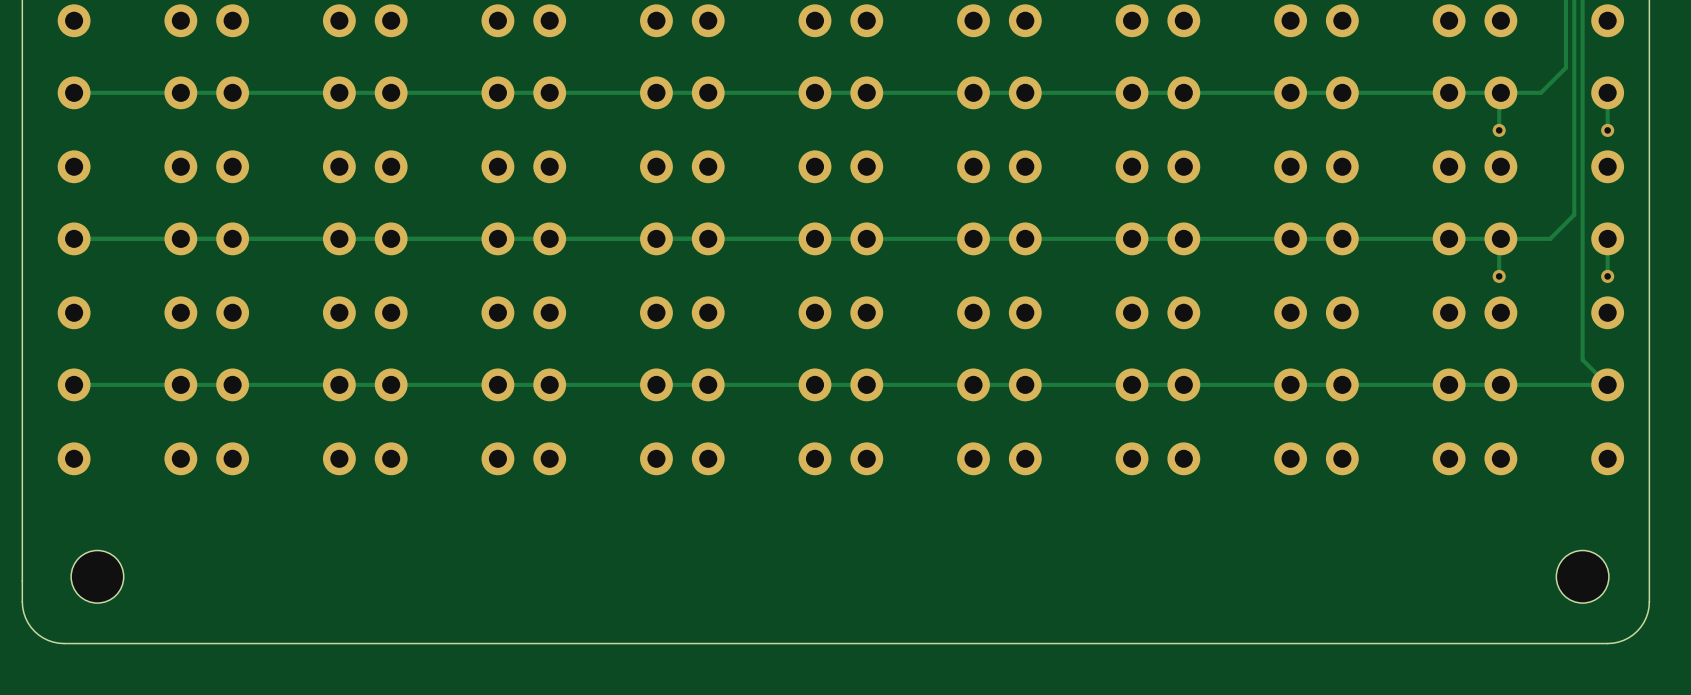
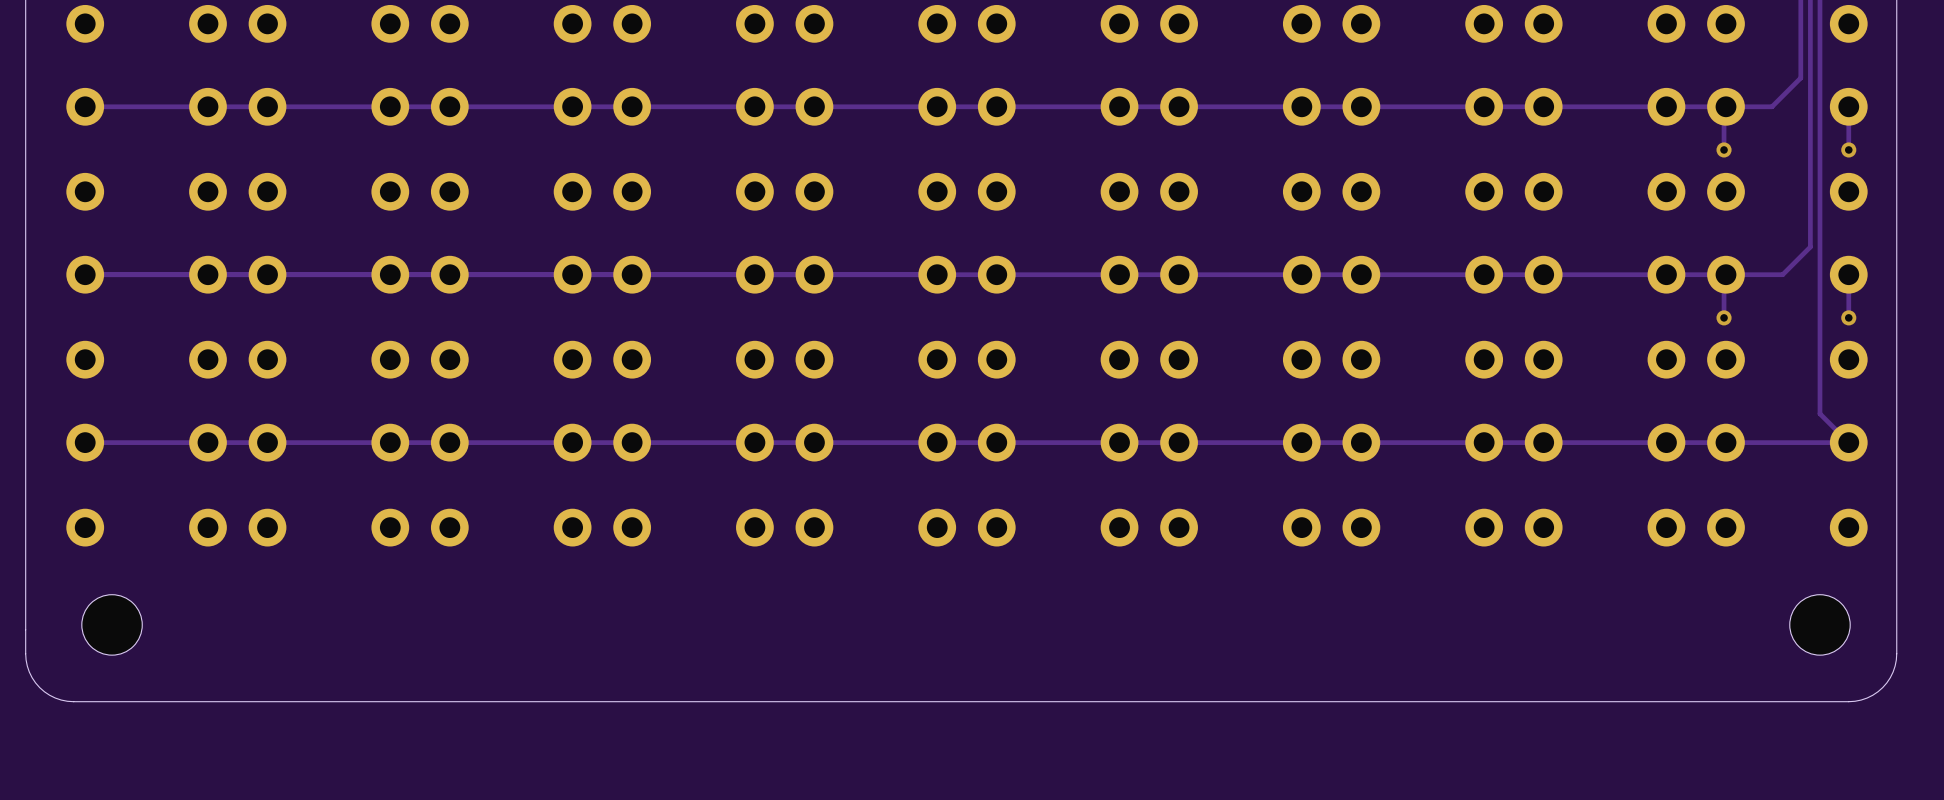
board edge: (1649, 568) (1649, 607) (1643, 622) (1628, 637) (1607, 643) (64, 643) (43, 637) (27, 622) (22, 607) (22, 568) -> (1896, 653) (1893, 672) (1882, 687) (1867, 698) (1848, 701) (73, 701) (55, 698) (39, 687) (29, 672) (25, 653)
part position: (97, 576) -> (112, 624)
part position: (1582, 576) -> (1819, 624)

